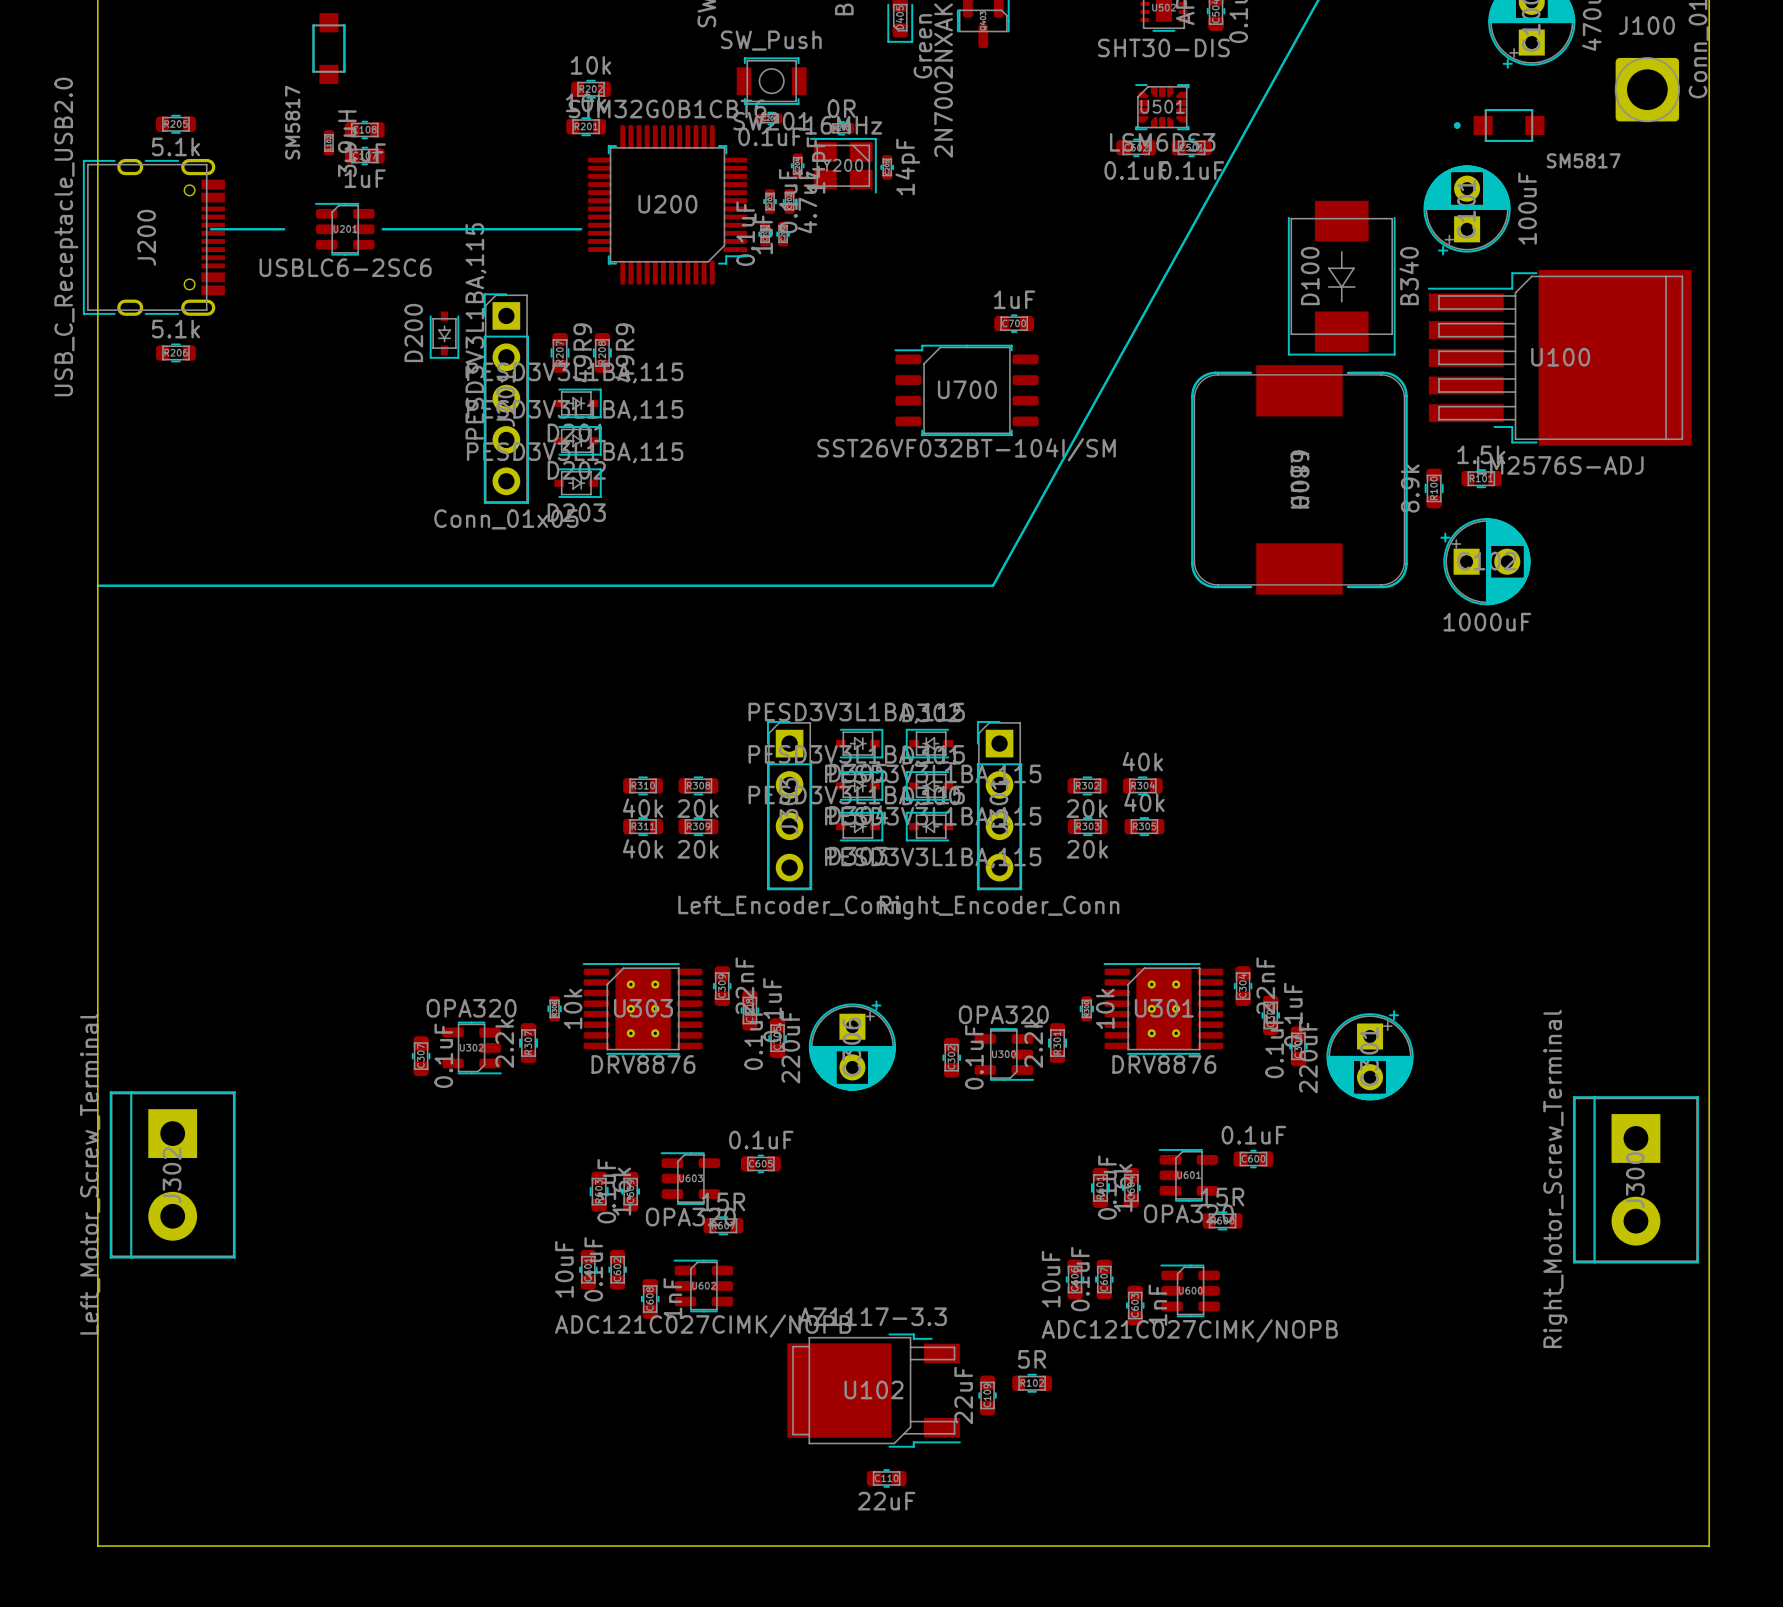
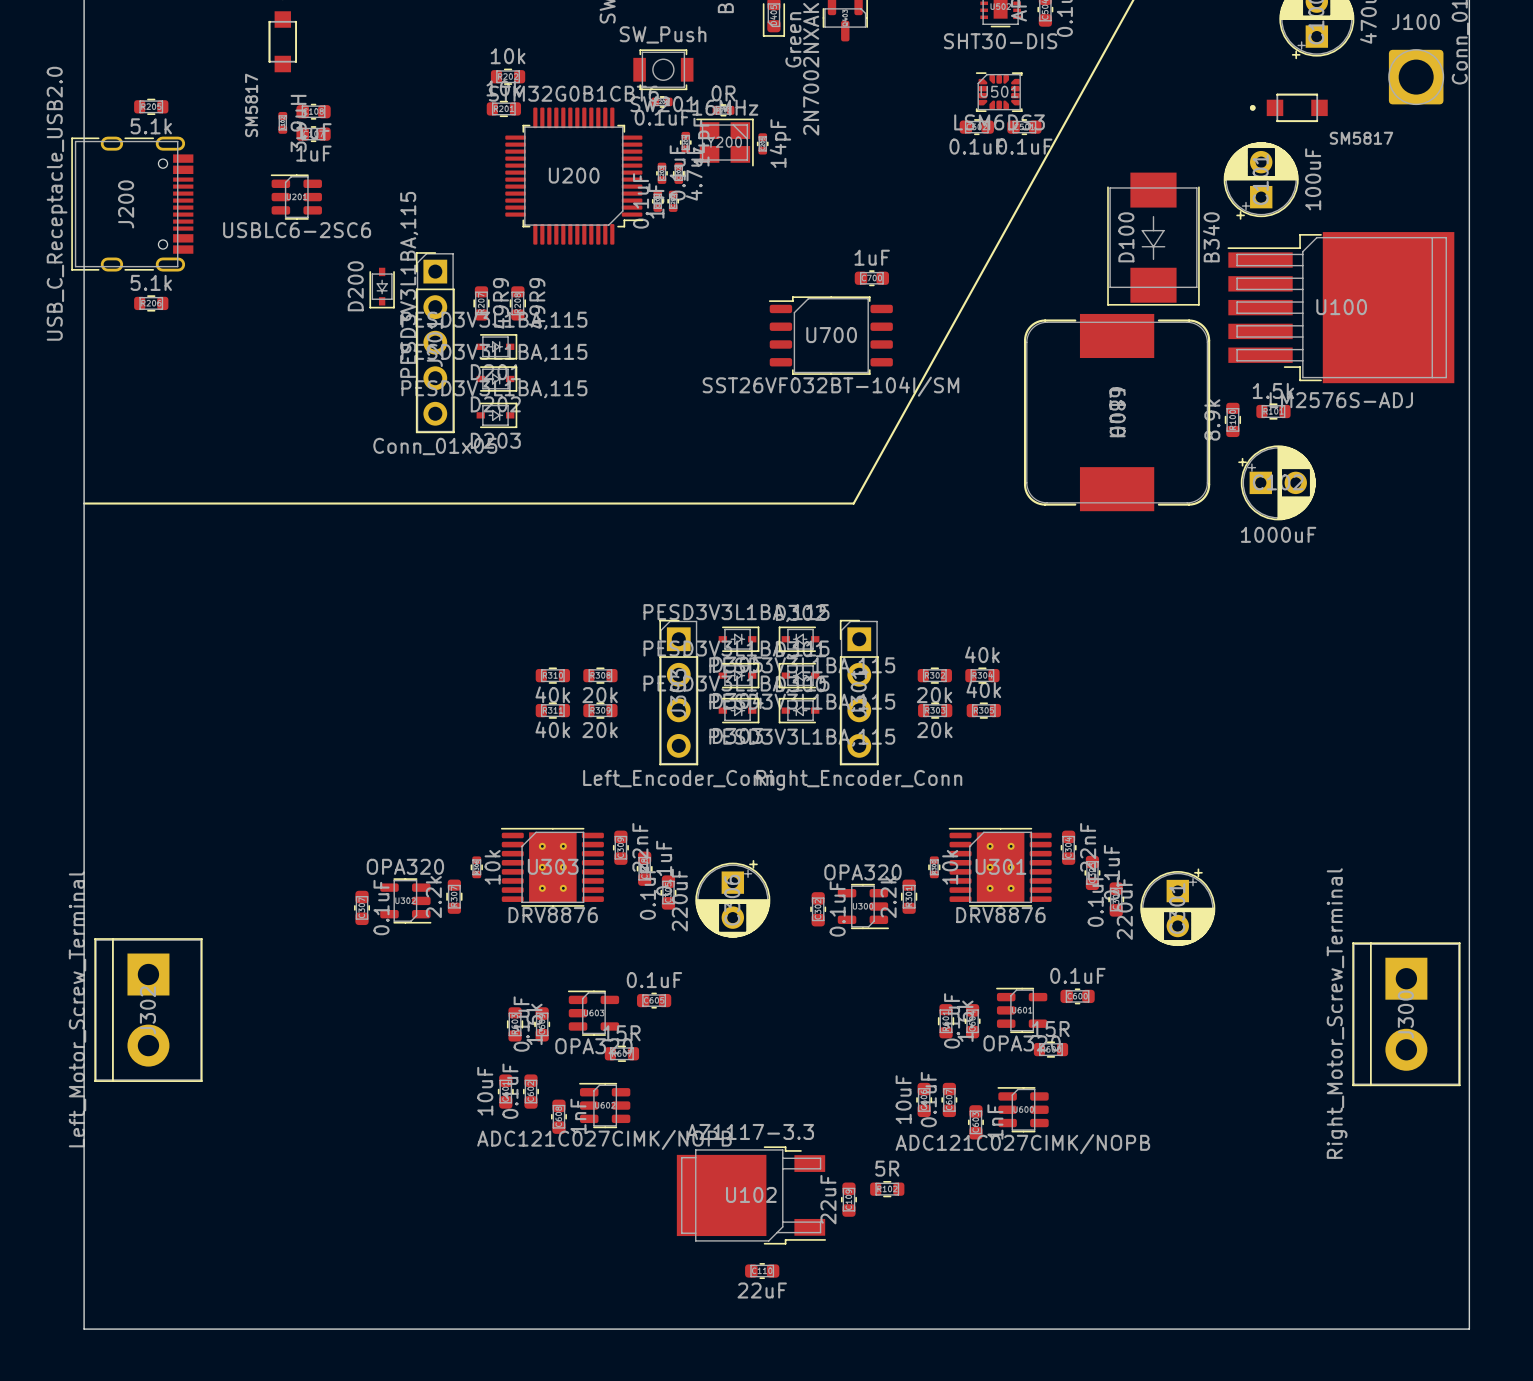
line: (210, 229) (284, 229) -> none
line: (382, 229) (581, 229) -> none

